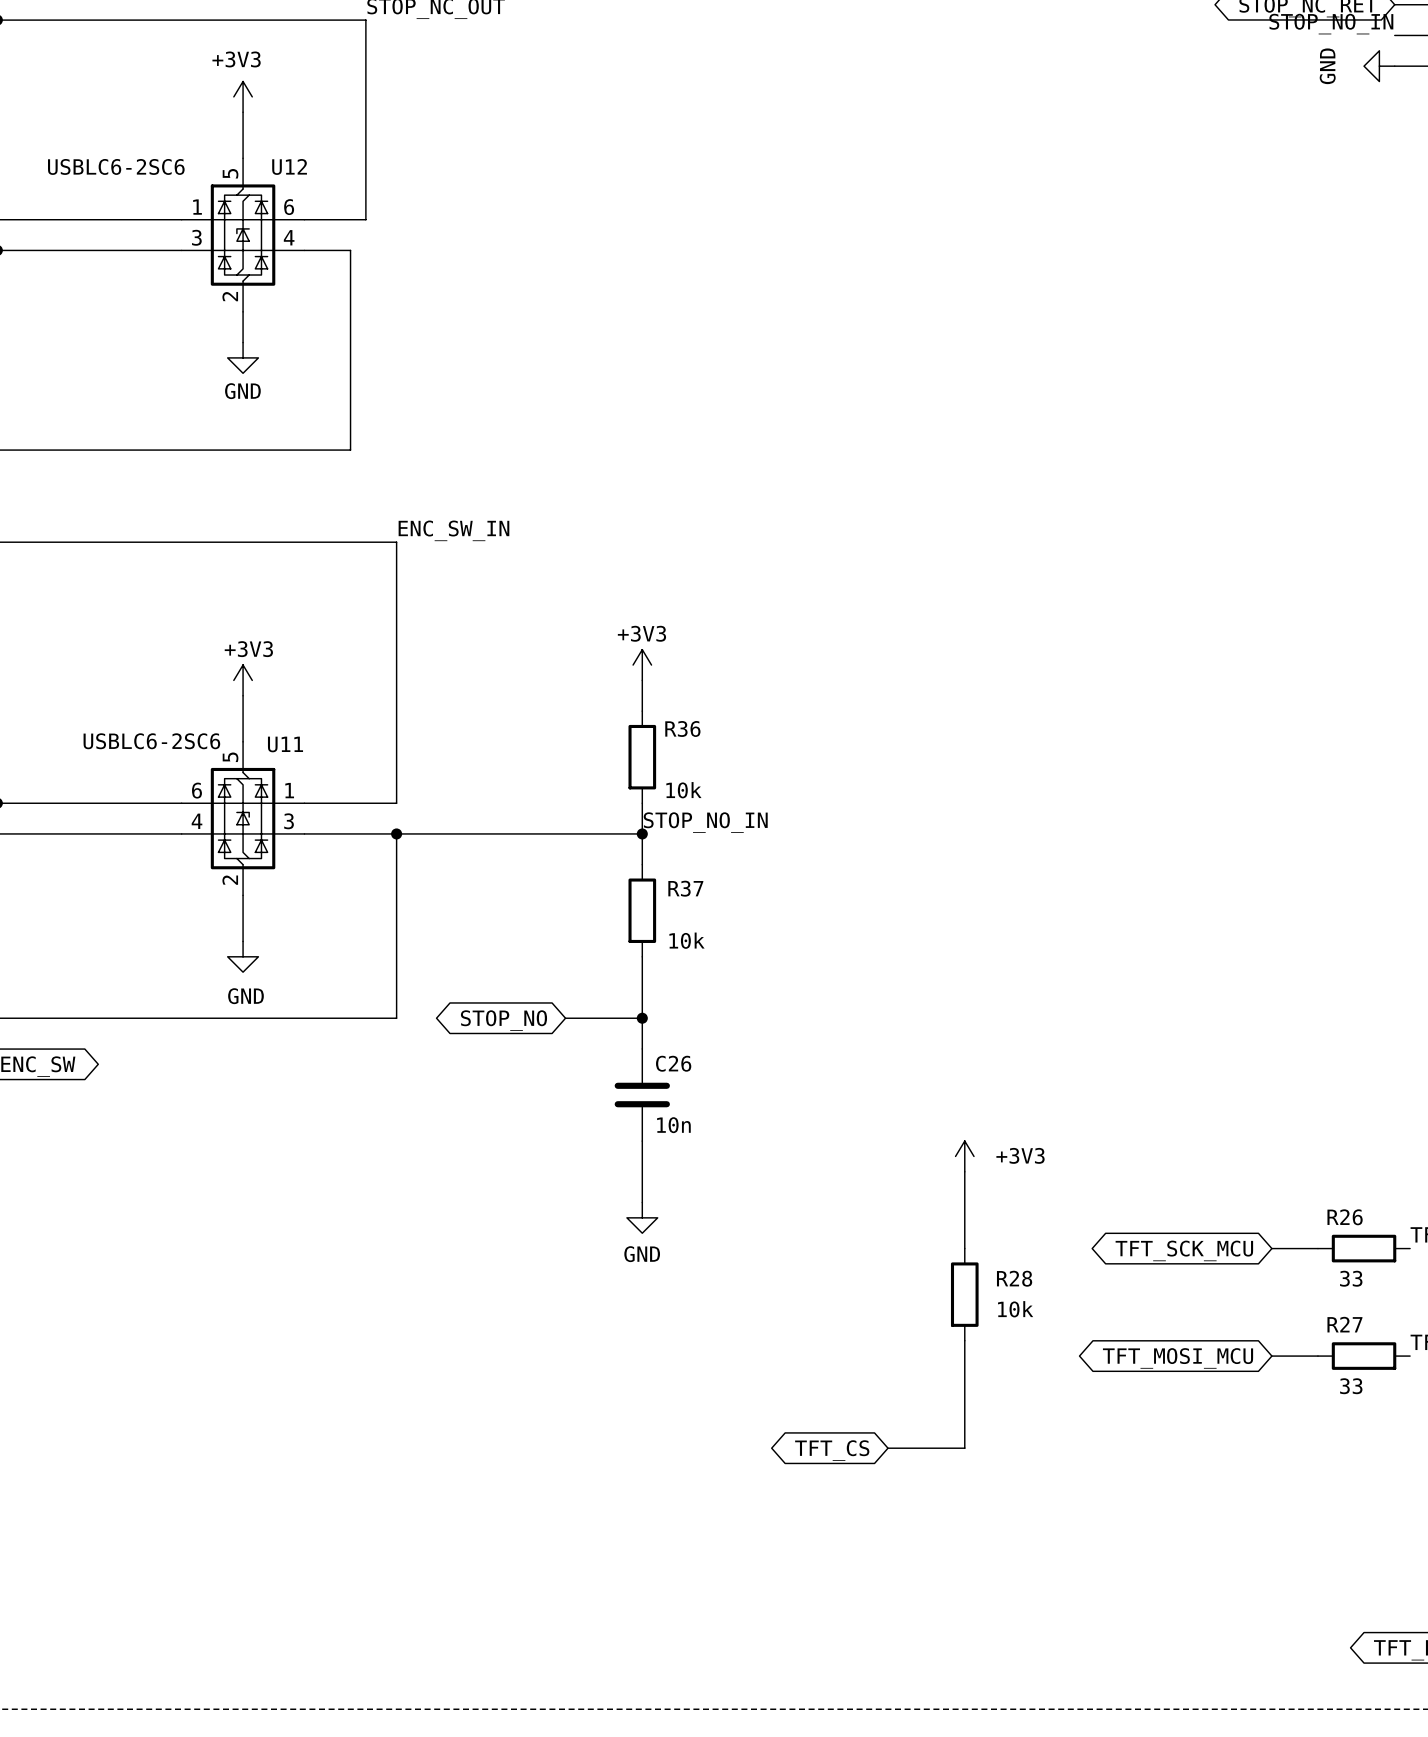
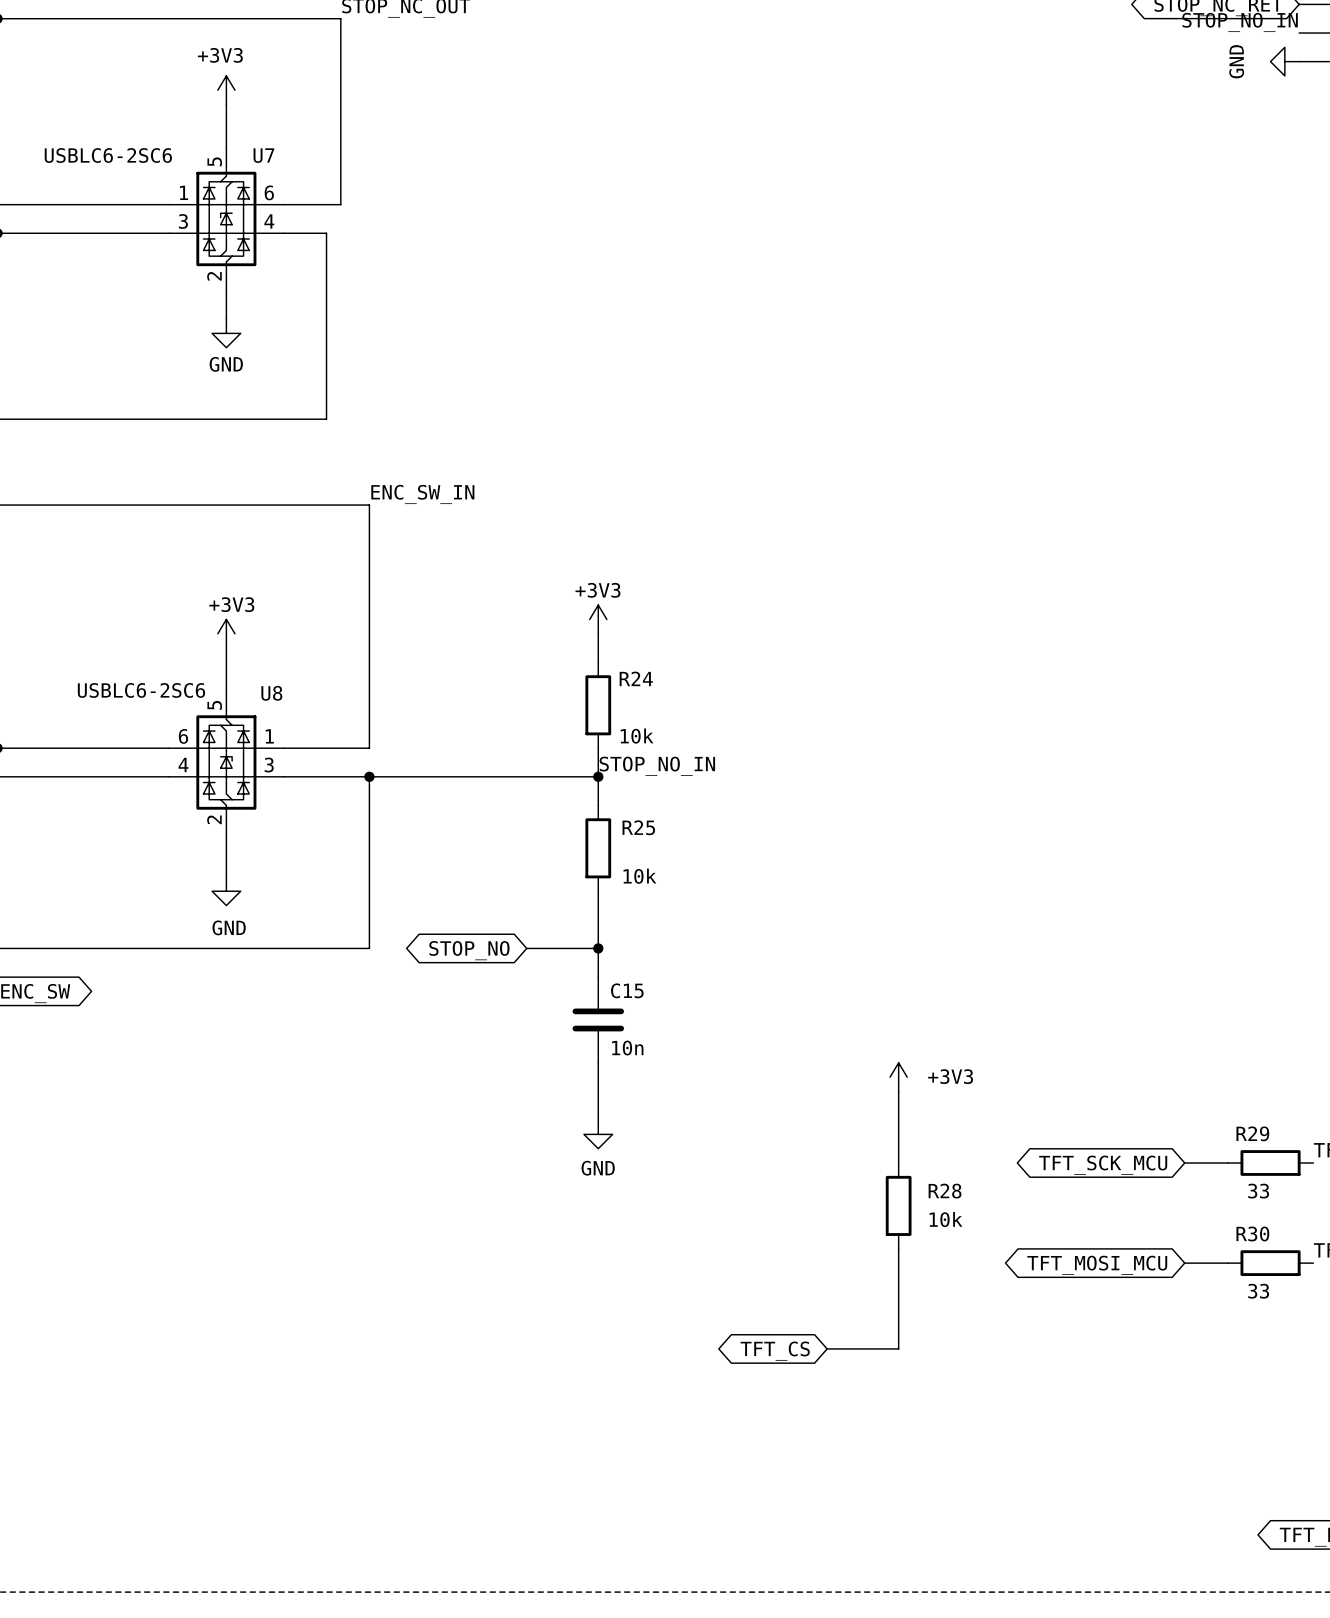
U12 name: U12 (289, 166) -> U7 (263, 155)
R36 name: R36 (682, 728) -> R24 (636, 678)
U11 name: U11 (285, 744) -> U8 (271, 693)
R37 name: R37 (685, 888) -> R25 (638, 827)
C26 name: C26 (673, 1063) -> C15 (627, 990)
R26 name: R26 (1345, 1217) -> R29 (1252, 1133)
R27 name: R27 (1344, 1324) -> R30 (1252, 1233)

